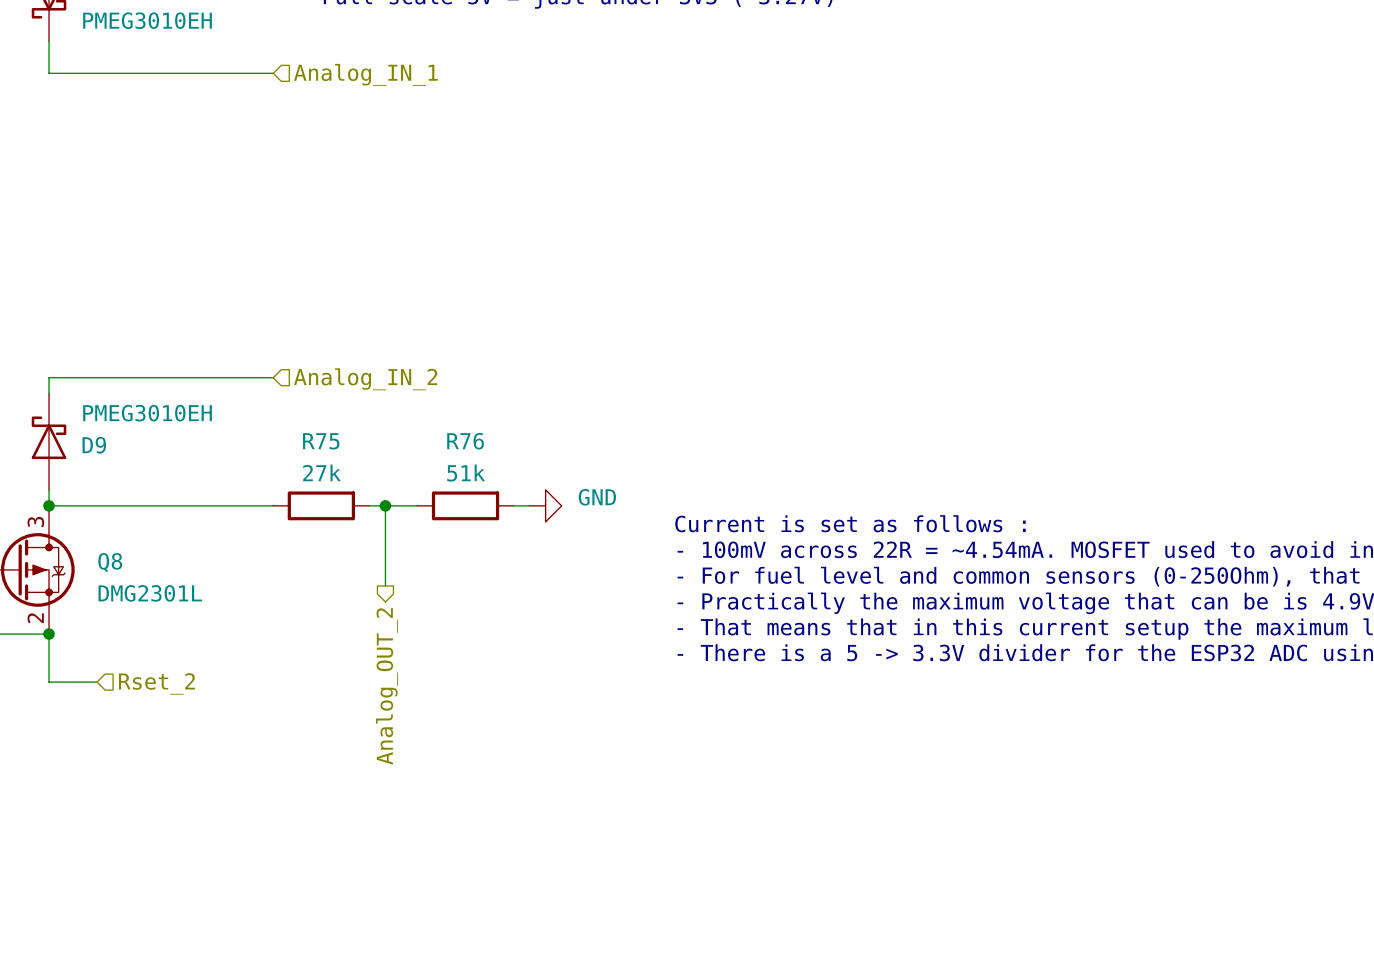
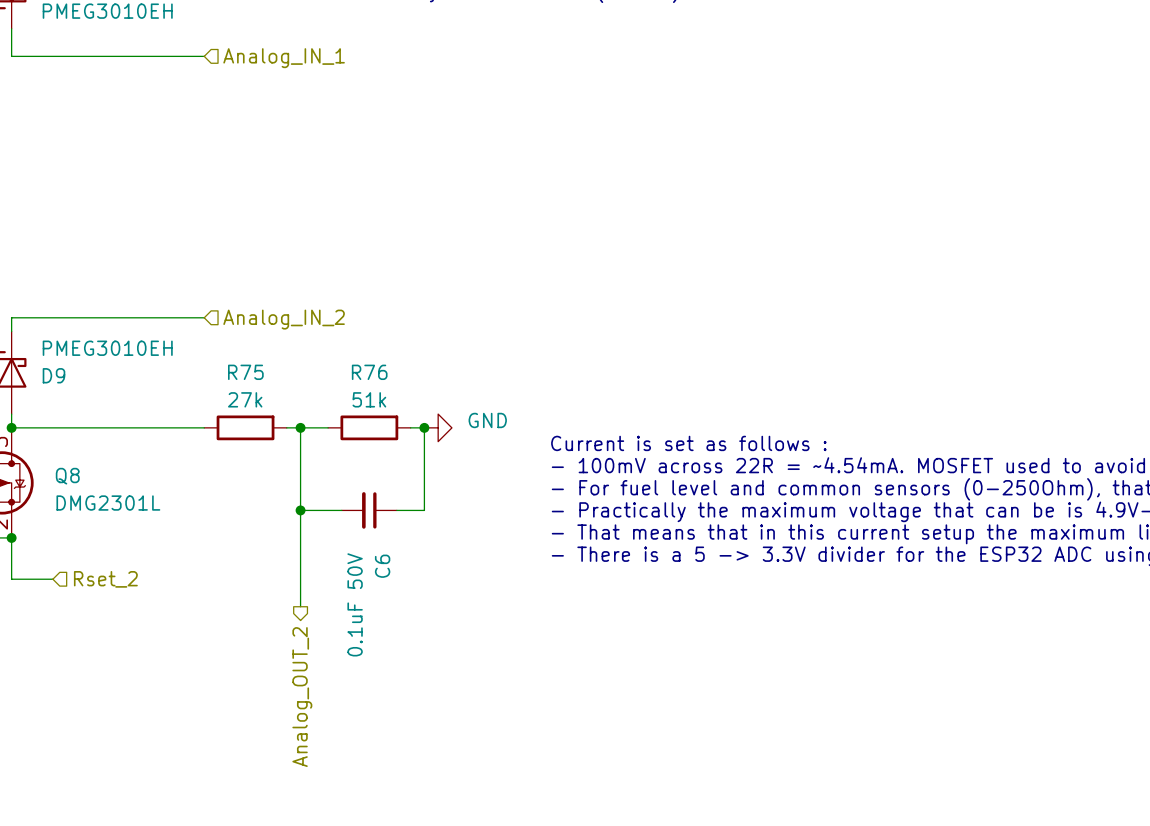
wire: none -> (424, 427) (424, 510) (396, 510)
junction: none -> (424, 427)
wire: none -> (300, 496) (300, 606)
wire: none -> (300, 510) (341, 510)
junction: none -> (300, 510)
C6: none -> 0.1uF 50V (369, 510)
hierarchical label position: Analog_OUT_2 (387, 686) -> Analog_OUT_2 (302, 697)

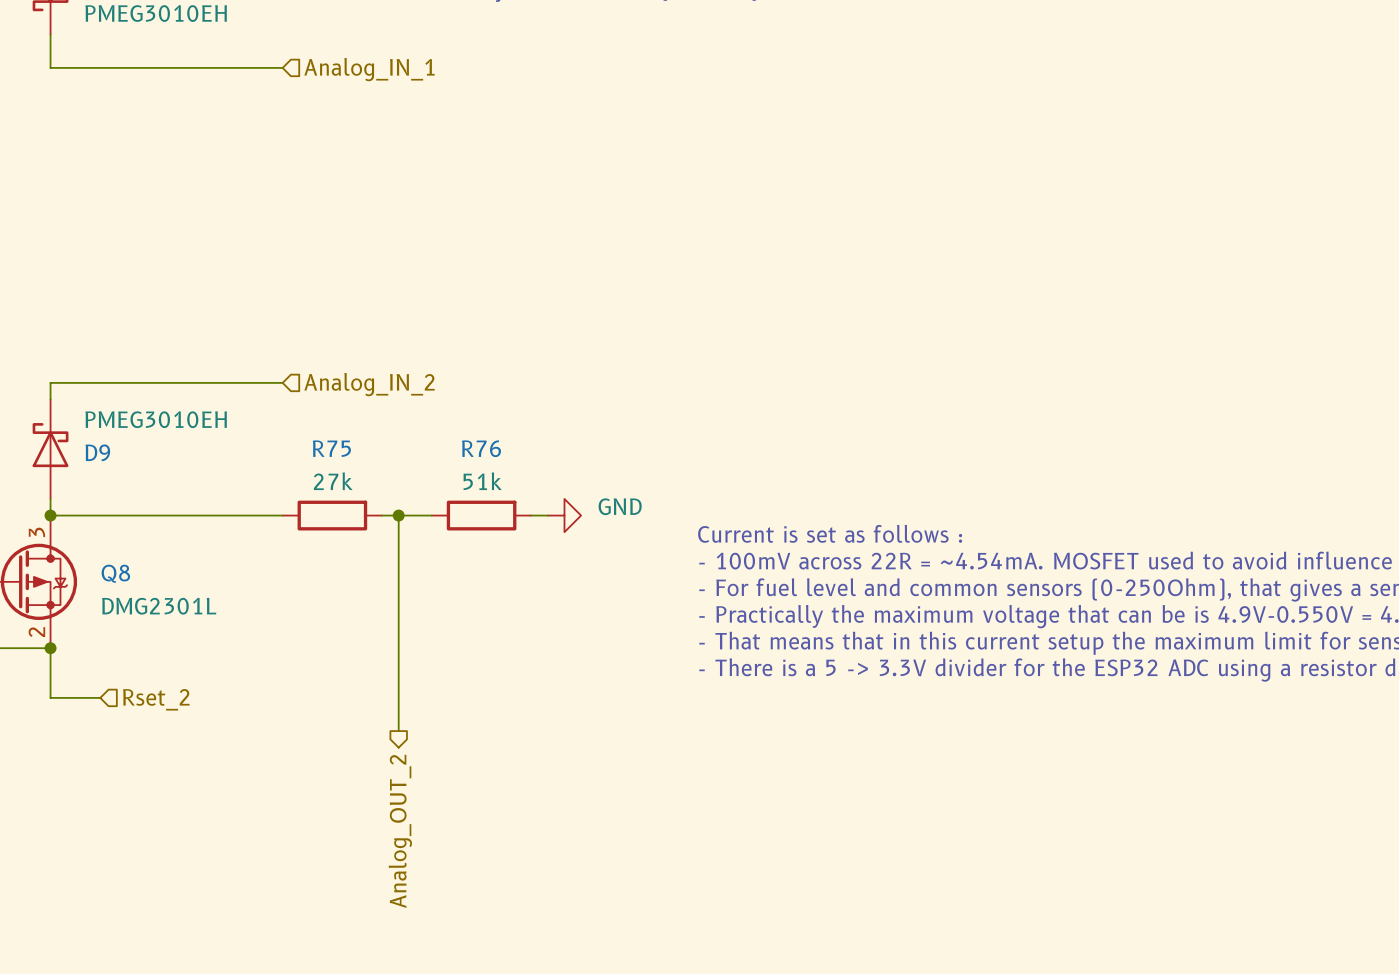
wire: (424, 427) (424, 510) (396, 510) -> none
junction: (424, 427) -> none
wire: (300, 510) (341, 510) -> none
junction: (300, 510) -> none
C6: 0.1uF 50V (369, 510) -> none

